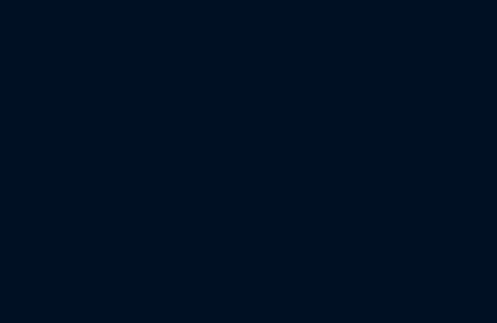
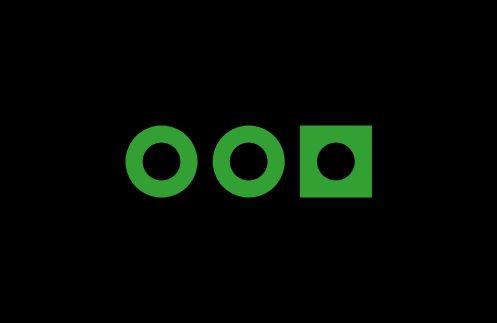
part: none -> (248, 161)

